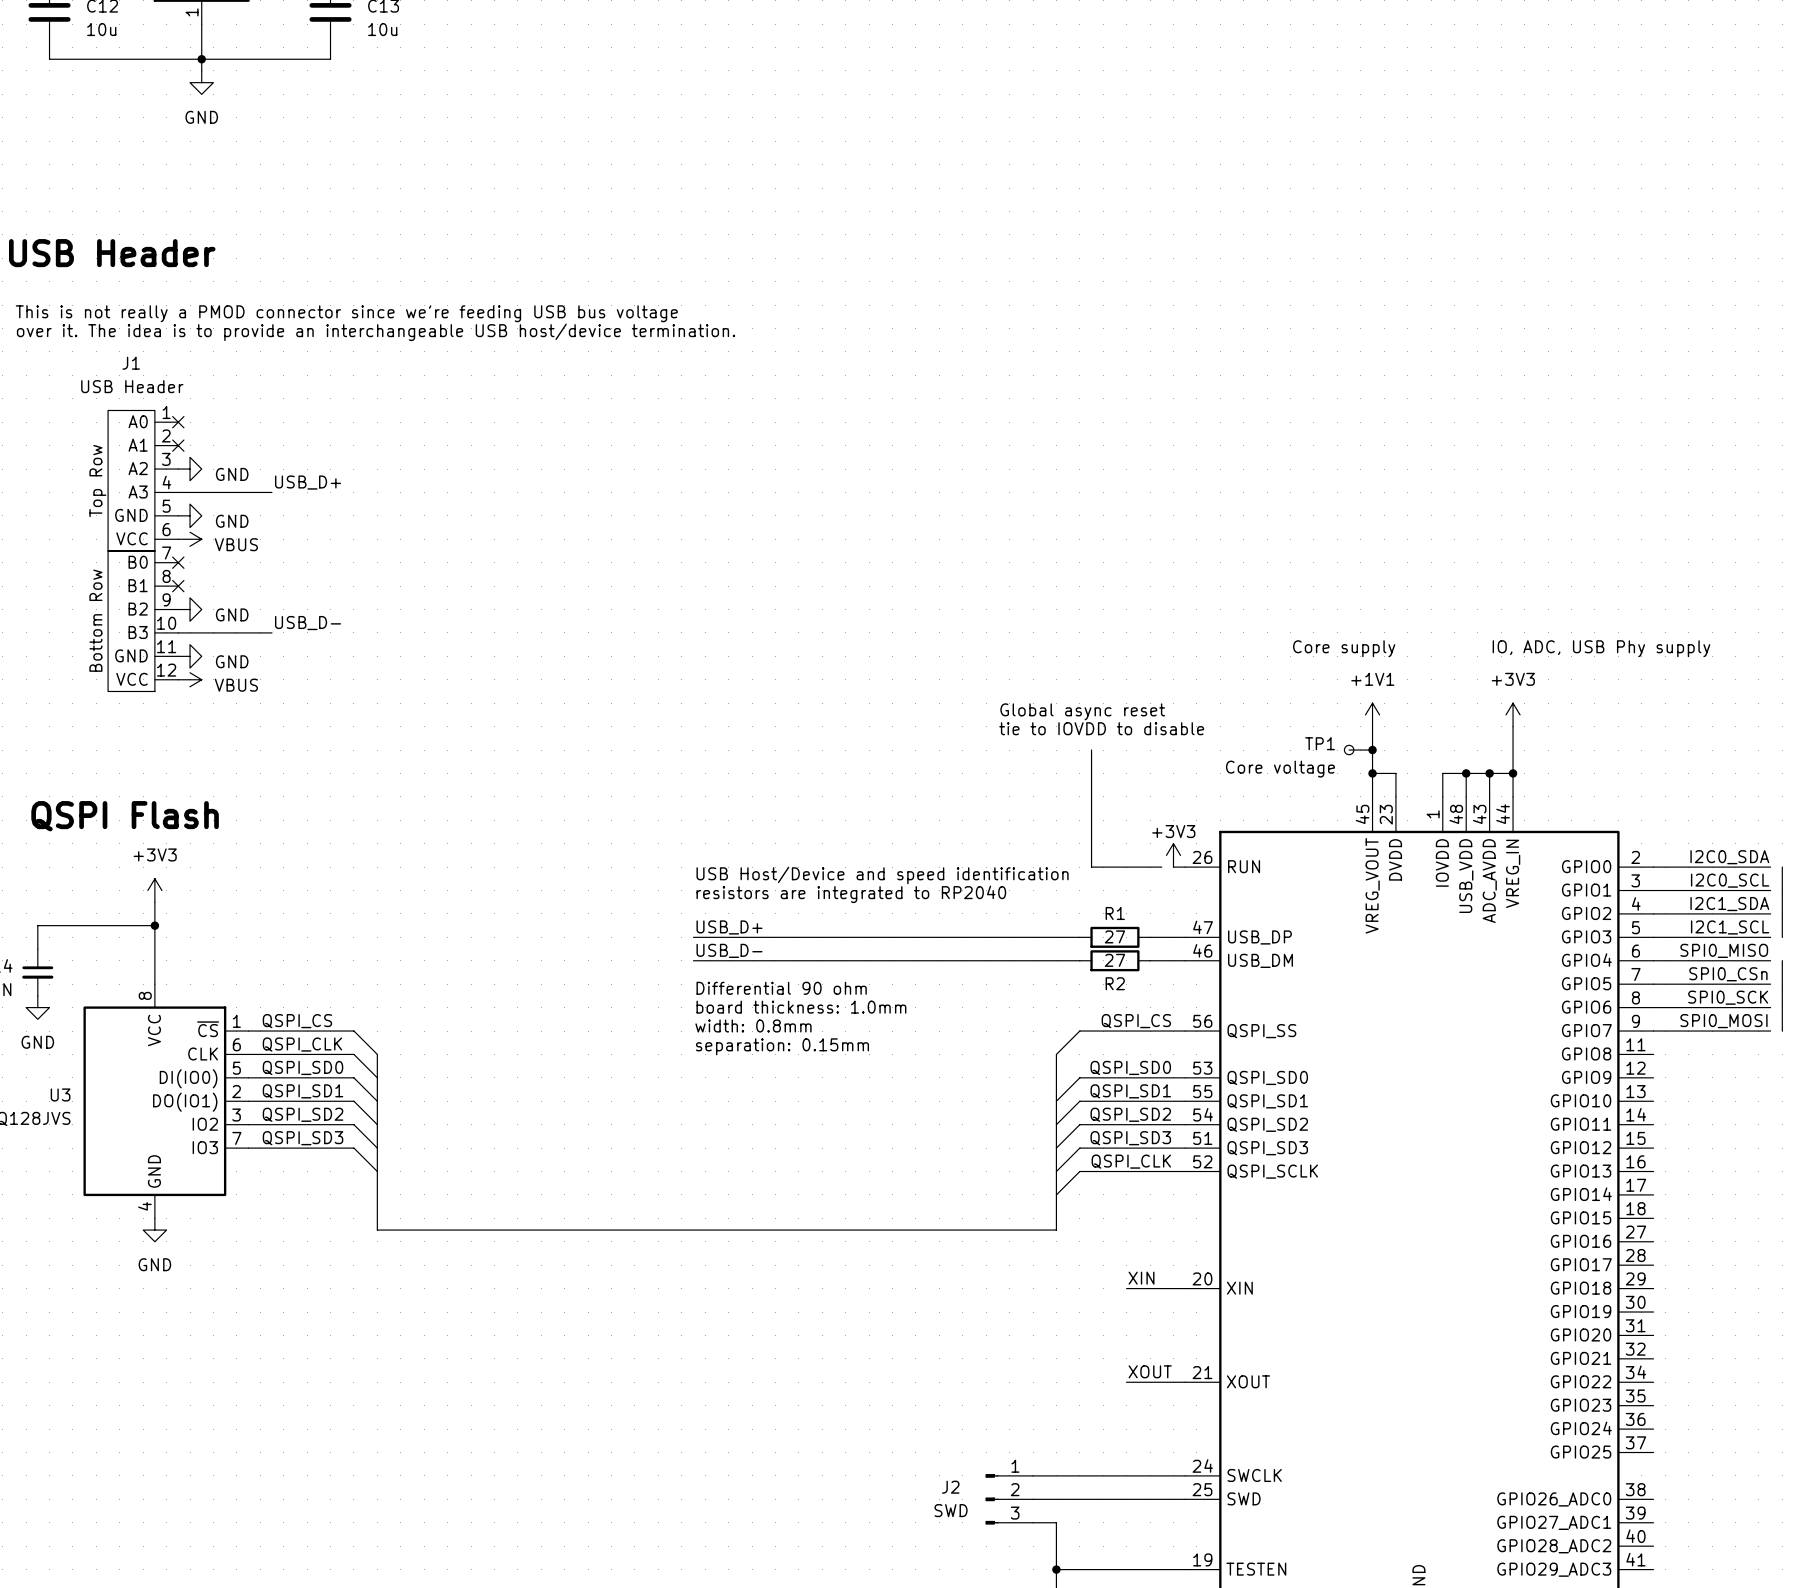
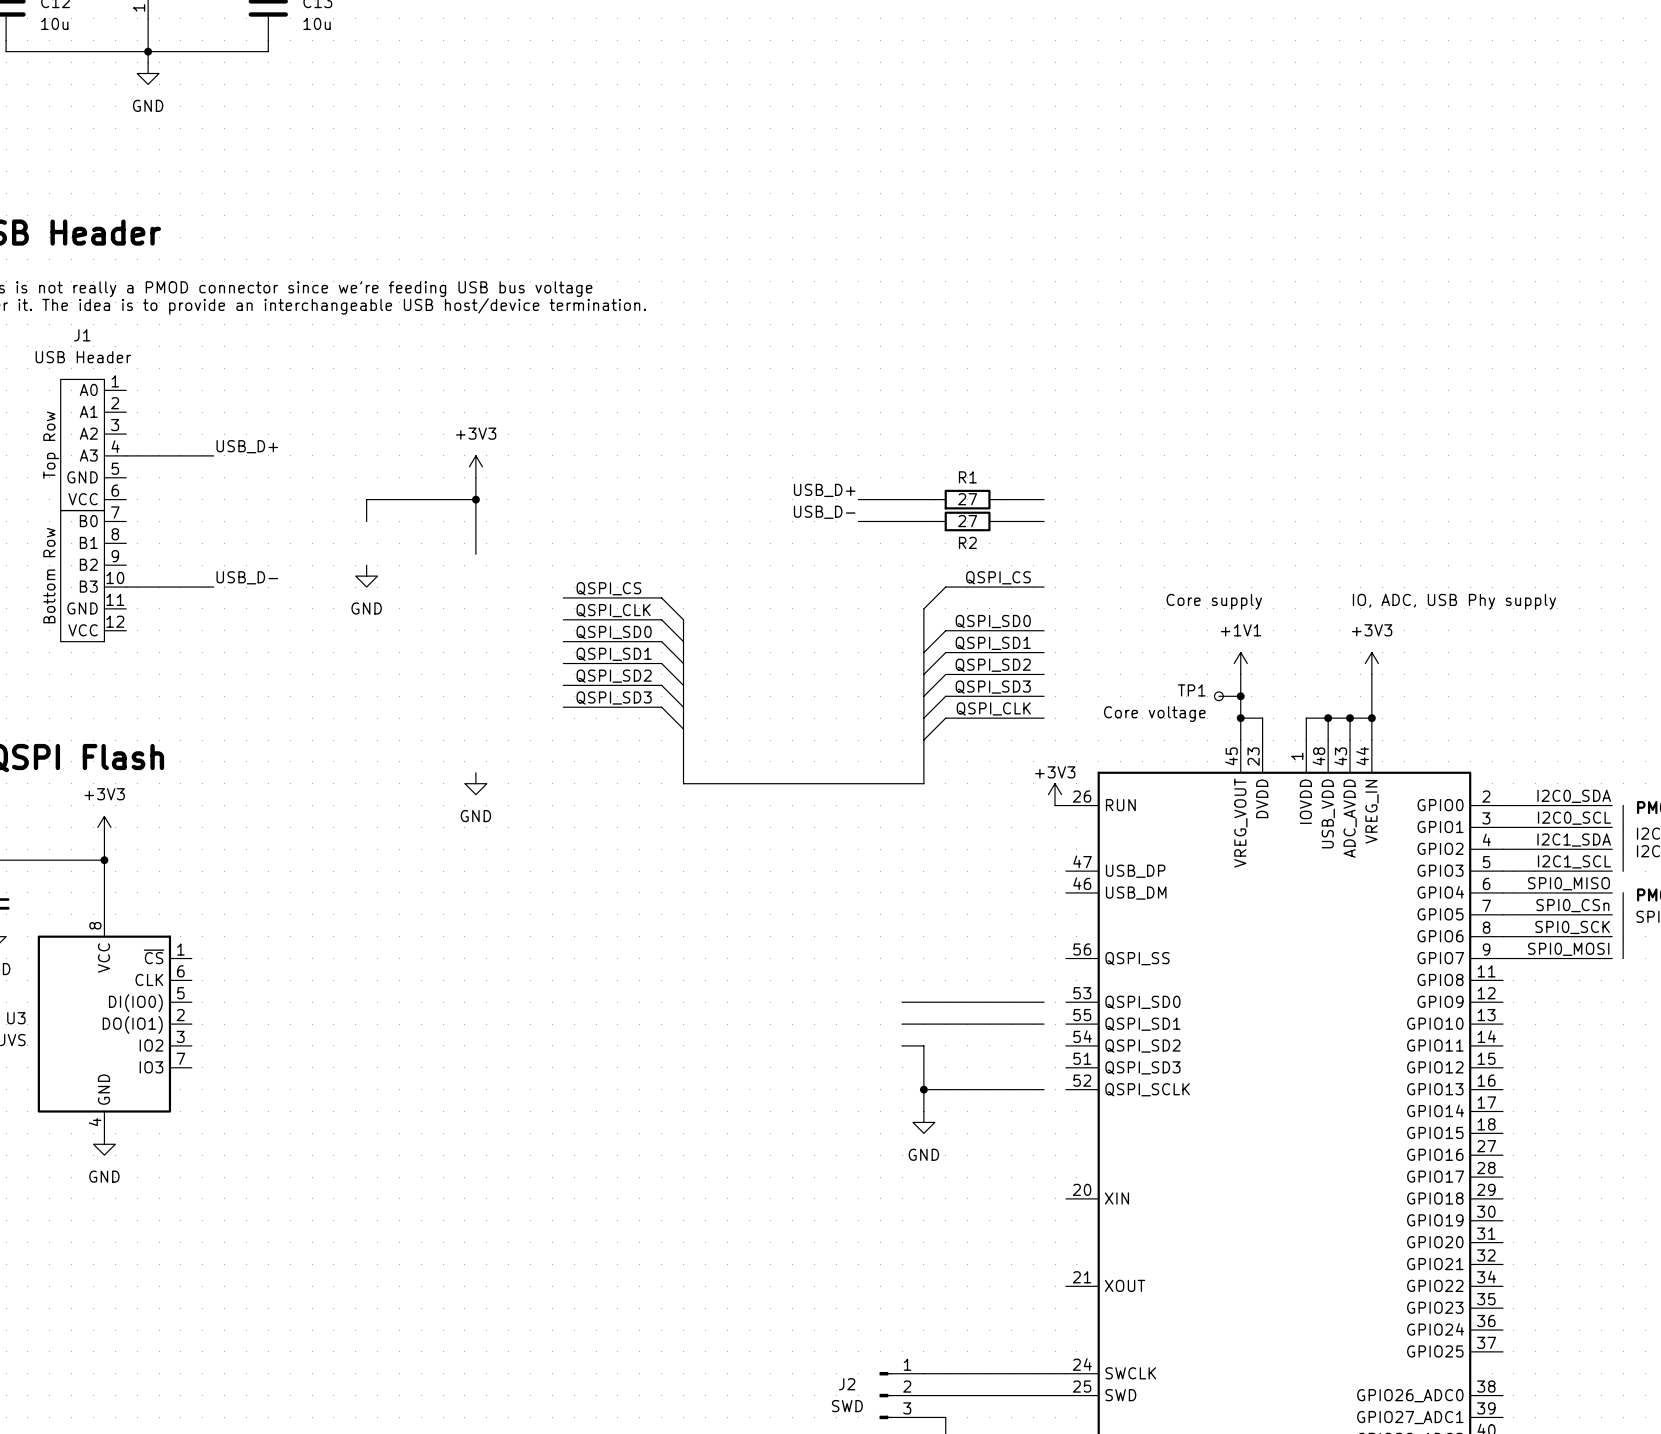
no-connect mark: (178, 422) -> none
no-connect mark: (178, 445) -> none
power symbol: GND (190, 469) -> none
power symbol: none -> +3V3 (475, 466)
power symbol: GND (190, 515) -> none
wire: none -> (475, 477) (475, 554)
label: none -> USB_D+ (824, 490)
power symbol: VBUS (190, 539) -> none
wire: none -> (475, 499) (366, 499) (366, 521)
junction: none -> (475, 499)
wire: none -> (858, 499) (934, 499)
wire: none -> (1000, 499) (1044, 499)
label: none -> USB_D- (824, 512)
no-connect mark: (178, 562) -> none
wire: none -> (858, 521) (934, 521)
wire: none -> (1000, 521) (1044, 521)
no-connect mark: (178, 586) -> none
power symbol: GND (190, 609) -> none
power symbol: none -> GND (366, 576)
label: none -> QSPI_CS (998, 577)
wire: none -> (1044, 587) (945, 587) (923, 608)
label: none -> QSPI_CS (608, 588)
wire: none -> (563, 597) (661, 597) (683, 619)
power symbol: GND (190, 656) -> none
bus: none -> (923, 608) (923, 783) (683, 783) (683, 619)
label: none -> QSPI_CLK (613, 610)
wire: none -> (563, 619) (661, 619) (683, 641)
label: none -> QSPI_SD0 (993, 621)
power symbol: VBUS (190, 679) -> none
wire: none -> (1044, 630) (945, 630) (923, 652)
label: none -> QSPI_SD0 (614, 632)
wire: none -> (563, 641) (661, 641) (683, 663)
label: none -> QSPI_SD1 (993, 643)
wire: none -> (1044, 652) (945, 652) (923, 674)
label: none -> QSPI_SD1 (614, 654)
text: Global async reset (1082, 711) -> none
wire: none -> (563, 663) (661, 663) (683, 685)
label: none -> QSPI_SD2 (993, 665)
wire: none -> (1044, 674) (945, 674) (923, 696)
label: none -> QSPI_SD2 (614, 676)
text: tie to IOVDD to disable (1101, 728) -> none
wire: none -> (563, 685) (661, 685) (683, 707)
label: none -> QSPI_SD3 (993, 687)
line: (1091, 750) (1091, 867) (1161, 867) -> none
wire: none -> (1044, 696) (945, 696) (923, 718)
label: none -> QSPI_SD3 (614, 697)
wire: none -> (563, 707) (661, 707) (683, 729)
label: none -> QSPI_CLK (993, 708)
wire: none -> (1044, 718) (945, 718) (923, 740)
power symbol: none -> GND (475, 783)
text: USB Host/Device and speed identification (882, 875) -> none
text: resistors are integrated to RP2040 (851, 894) -> none
label: USB_D+ (729, 927) -> none
wire: (693, 937) (1079, 937) -> none
R1 position: (1114, 937) -> (967, 499)
wire: (1150, 937) (1185, 937) -> none
label: USB_D- (729, 950) -> none
wire: (693, 960) (1079, 960) -> none
R2 position: (1114, 960) -> (967, 521)
wire: (1150, 960) (1185, 960) -> none
text: Differential 90 ohm (781, 988) -> none
text: board thickness: 1.0mm (801, 1007) -> none
label: QSPI_CS (297, 1021) -> none
label: QSPI_CS (1136, 1021) -> none
text: width: 0.8mm (753, 1025) -> none
wire: (248, 1031) (353, 1031) (377, 1054) -> none
wire: (1185, 1031) (1079, 1031) (1056, 1054) -> none
label: QSPI_CLK (302, 1044) -> none
text: separation: 0.15mm (782, 1046) -> none
wire: (248, 1054) (353, 1054) (377, 1077) -> none
bus: (377, 1054) (377, 1230) (1056, 1230) (1056, 1054) -> none
label: QSPI_SD0 (303, 1067) -> none
label: QSPI_SD0 (1130, 1067) -> none
wire: (248, 1077) (353, 1077) (377, 1101) -> none
wire: (1079, 1077) (1056, 1101) -> (967, 1002) (902, 1002)
wire: (1161, 1077) (1185, 1077) -> none
label: QSPI_SD1 (303, 1091) -> none
label: QSPI_SD1 (1130, 1091) -> none
wire: (248, 1101) (353, 1101) (377, 1124) -> none
wire: (1079, 1101) (1056, 1124) -> (967, 1024) (902, 1024)
wire: (1161, 1101) (1185, 1101) -> none
label: QSPI_SD2 (303, 1114) -> none
label: QSPI_SD2 (1130, 1114) -> none
wire: (248, 1124) (353, 1124) (377, 1148) -> none
wire: none -> (902, 1045) (923, 1045) (923, 1111)
wire: (1185, 1124) (1079, 1124) (1056, 1148) -> none
label: QSPI_SD3 (303, 1138) -> none
label: QSPI_SD3 (1130, 1138) -> none
wire: (248, 1148) (353, 1148) (377, 1171) -> none
wire: (1185, 1148) (1079, 1148) (1056, 1171) -> none
label: QSPI_CLK (1131, 1161) -> none
junction: none -> (923, 1089)
wire: (1079, 1171) (1056, 1194) -> (967, 1089) (923, 1089)
wire: (1161, 1171) (1185, 1171) -> none
power symbol: none -> GND (923, 1122)
label: XIN (1141, 1278) -> none
wire: (1126, 1288) (1185, 1288) -> none
label: XOUT (1150, 1371) -> none
wire: (1126, 1382) (1185, 1382) -> none

